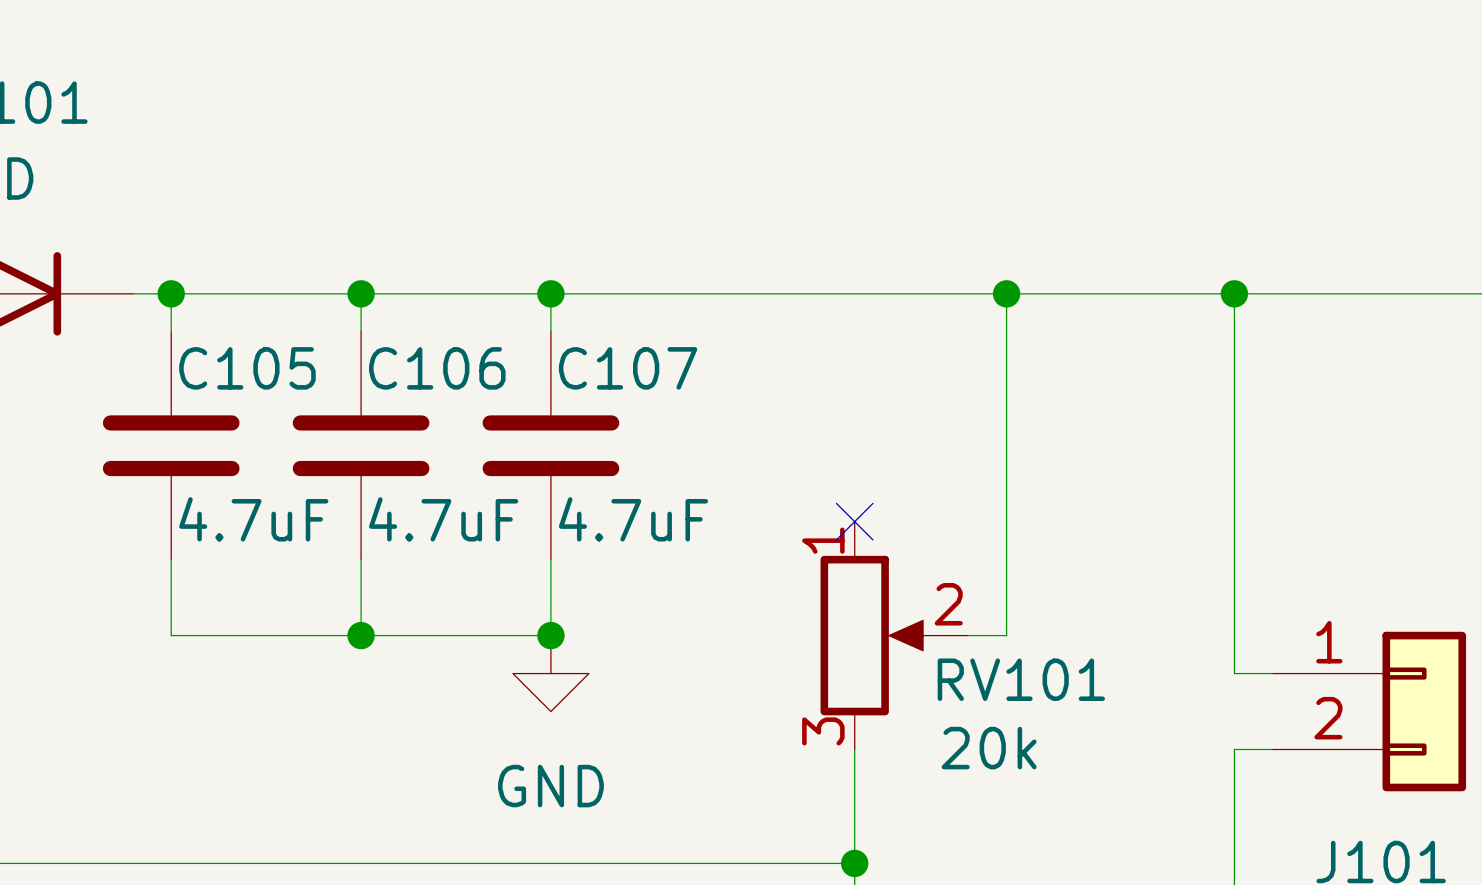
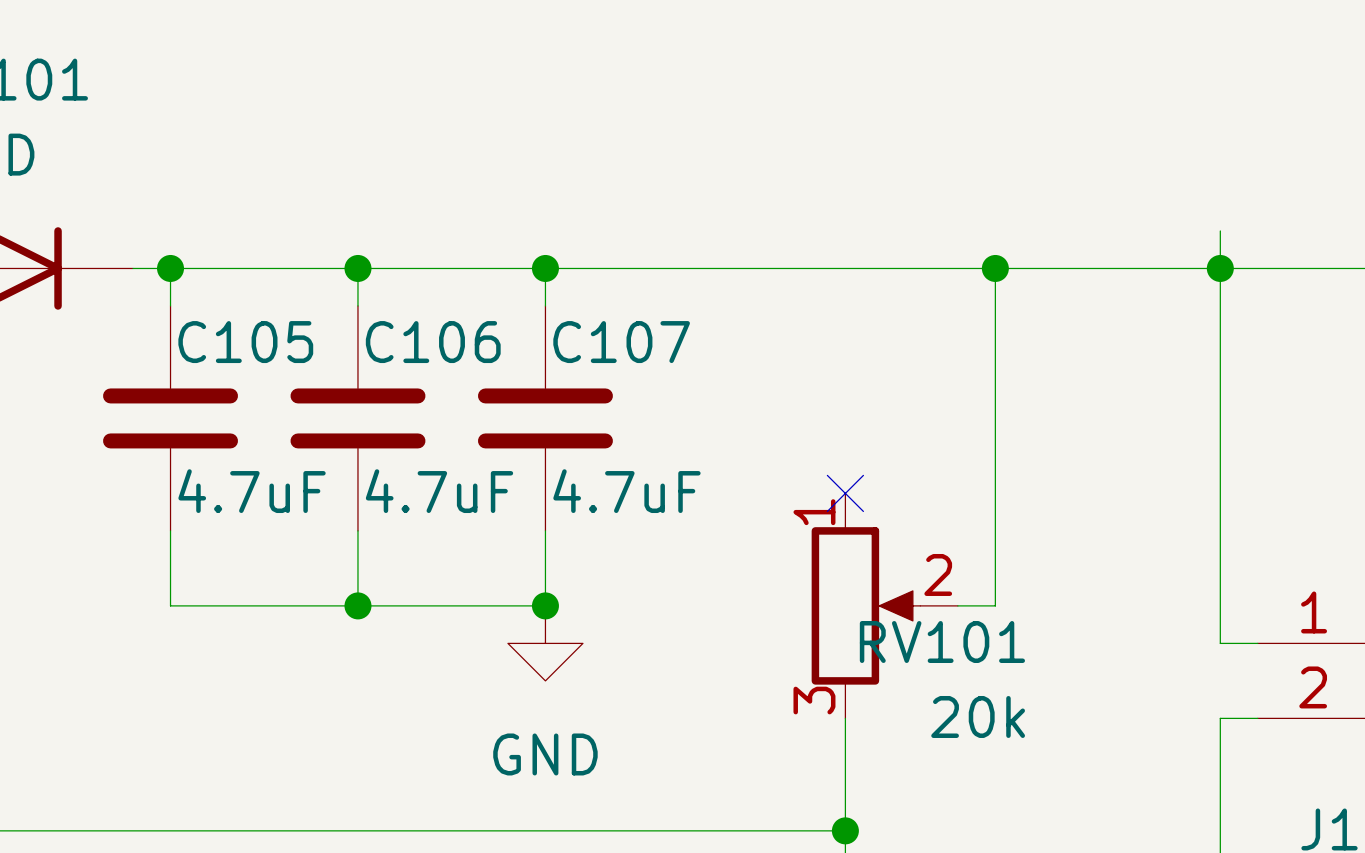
wire: none -> (1220, 230) (1220, 268)
RV101 name position: RV101 (1021, 679) -> RV101 (942, 642)

